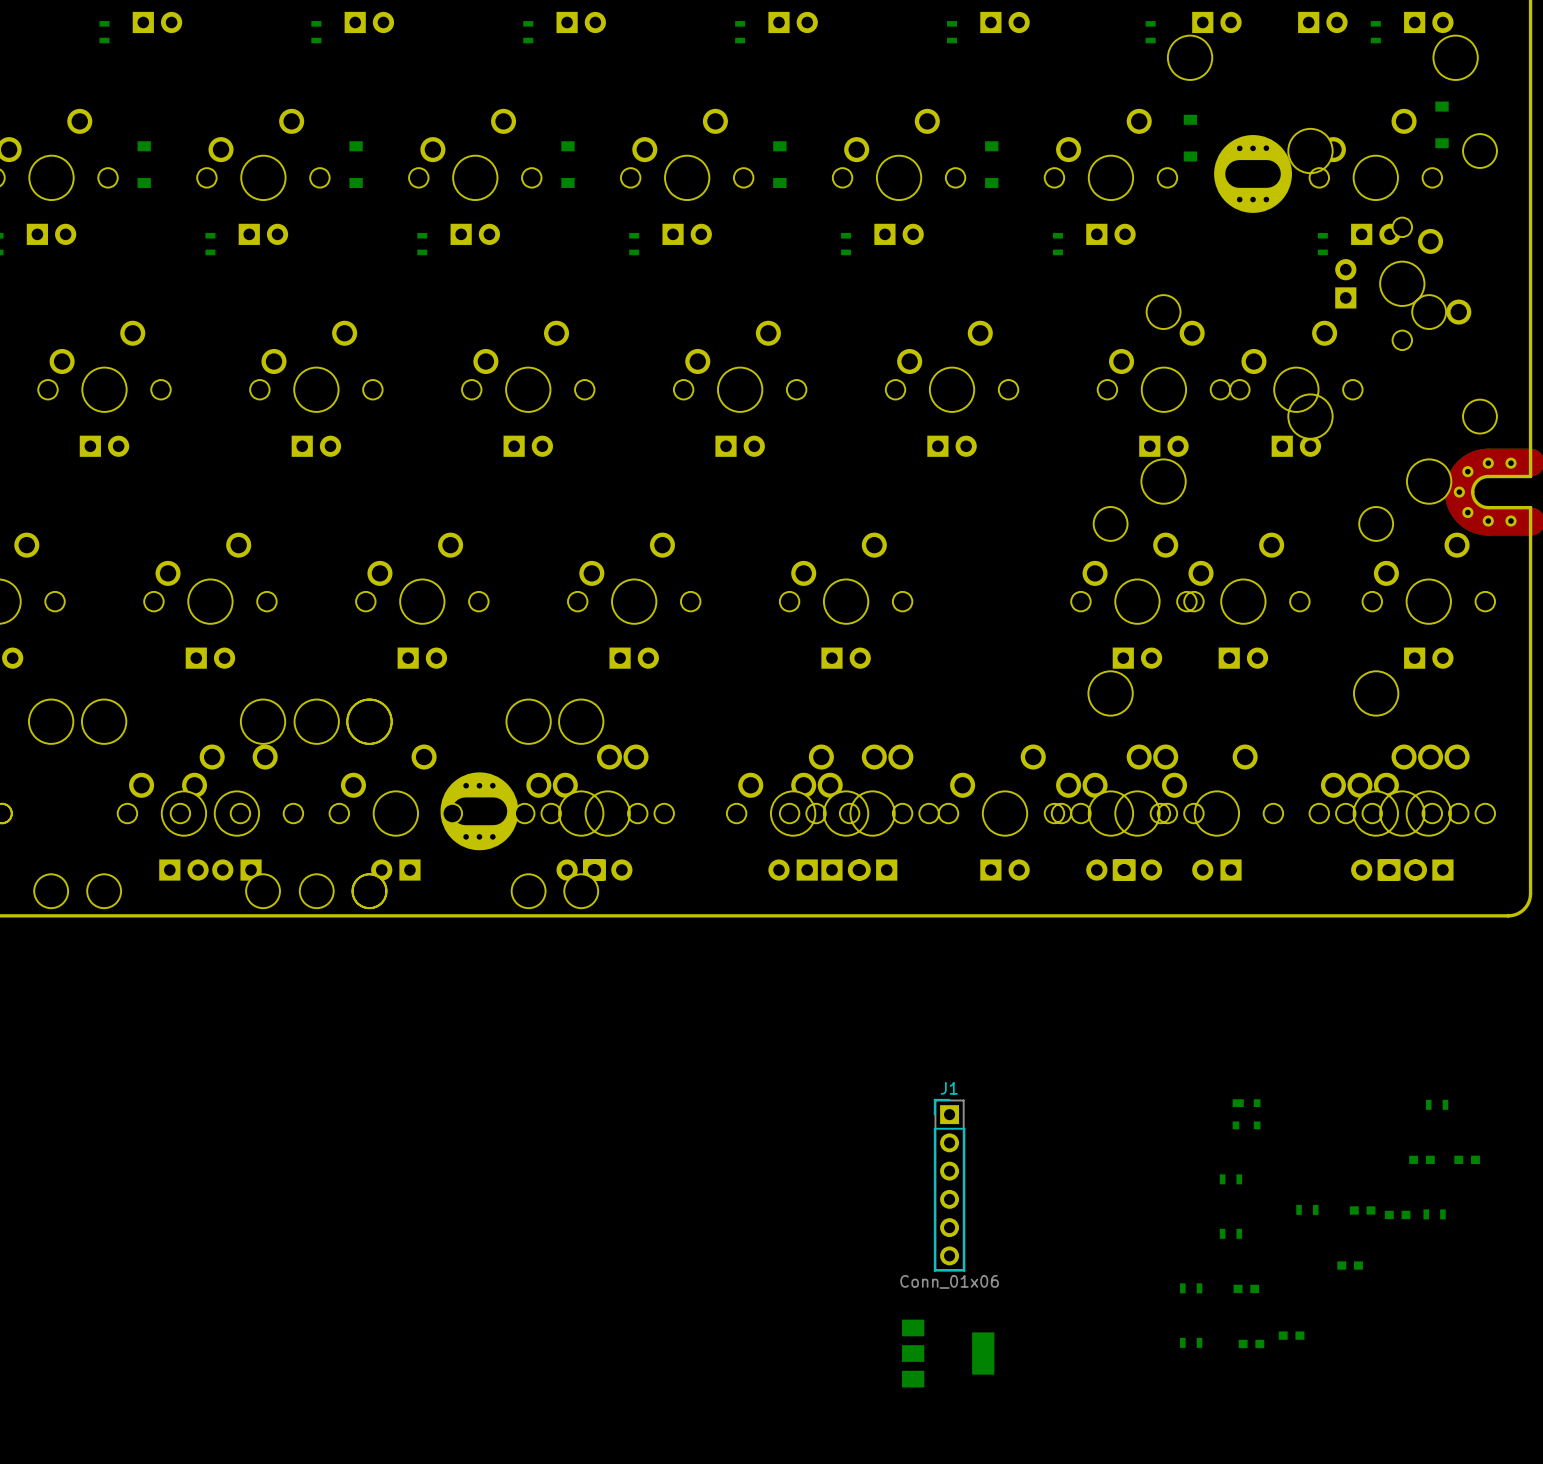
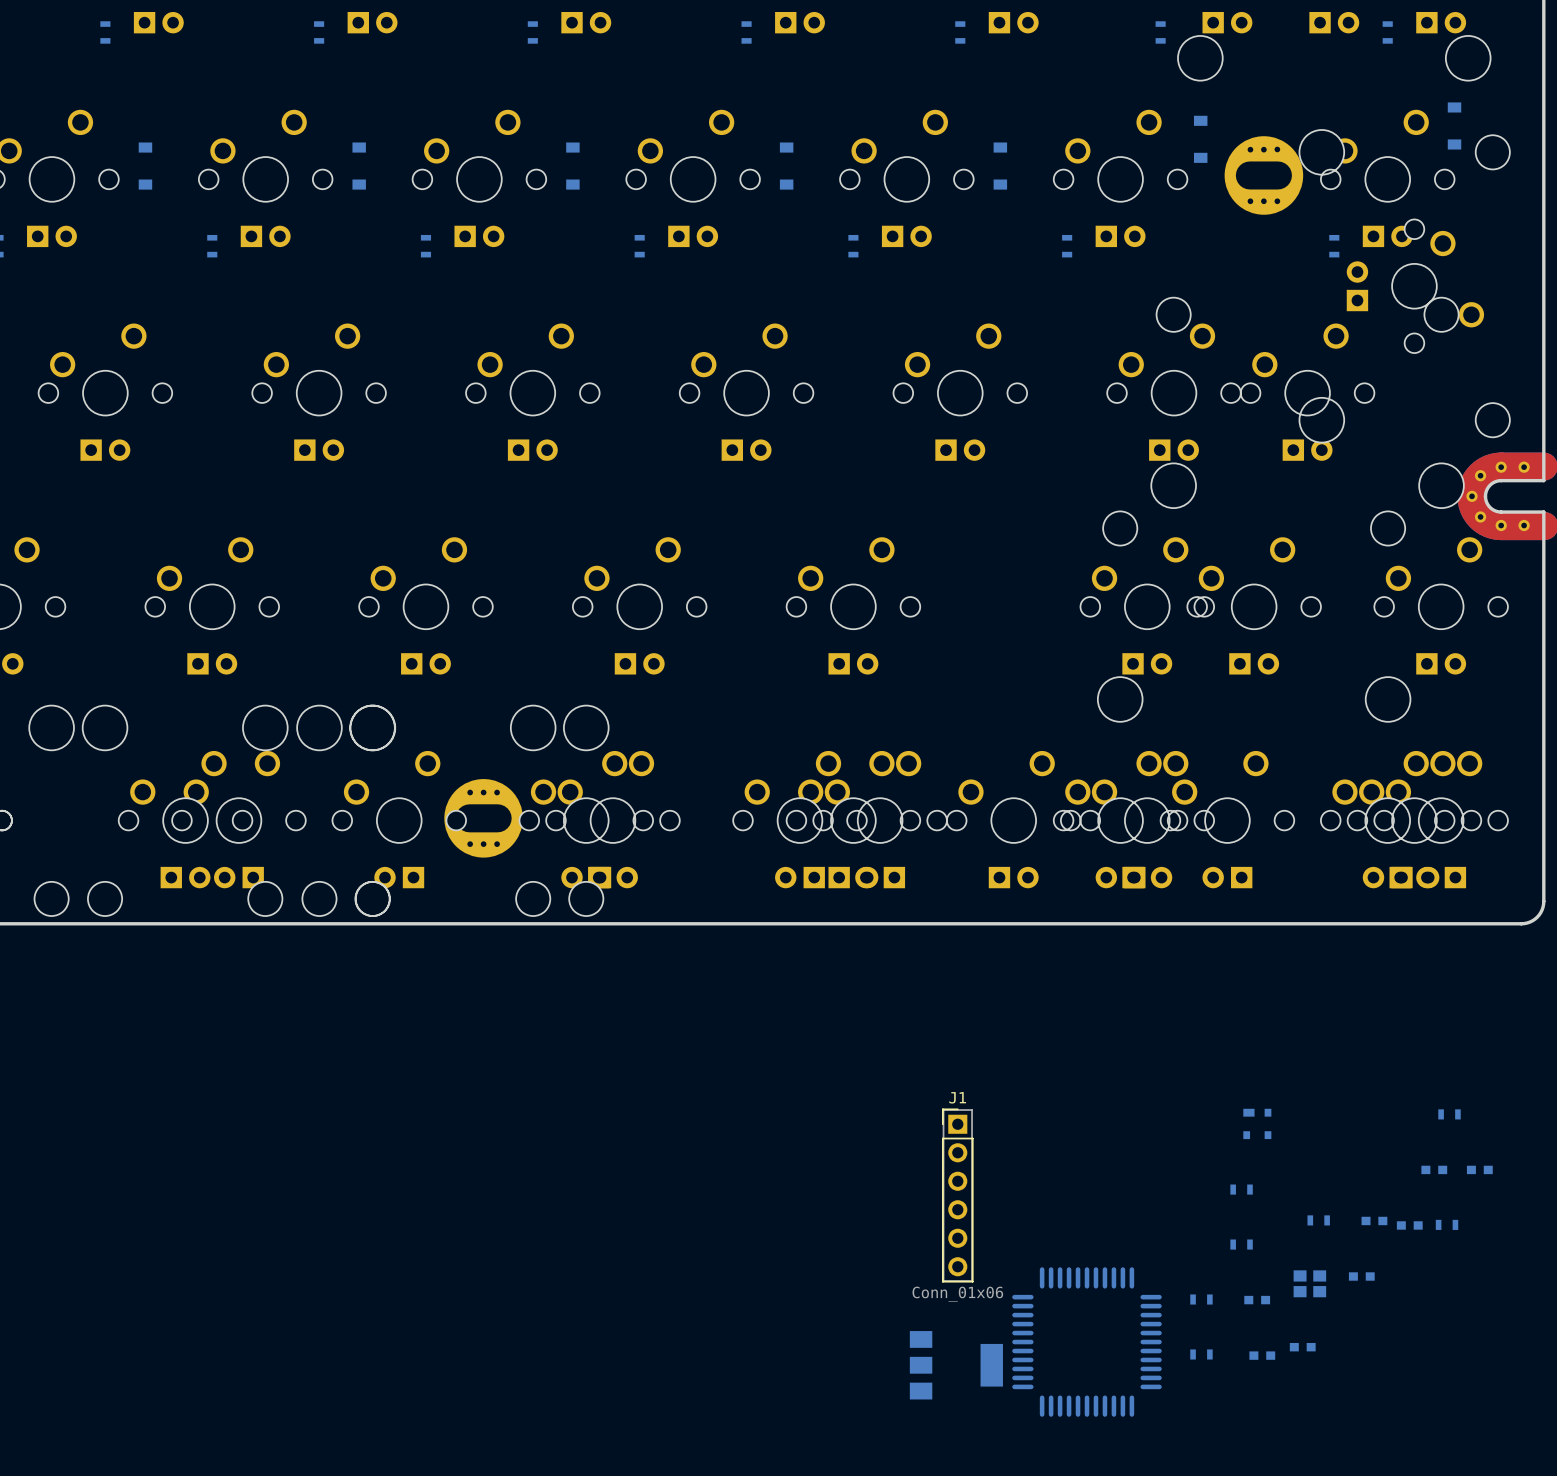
part: none -> (1309, 1283)
part: none -> (1087, 1342)

